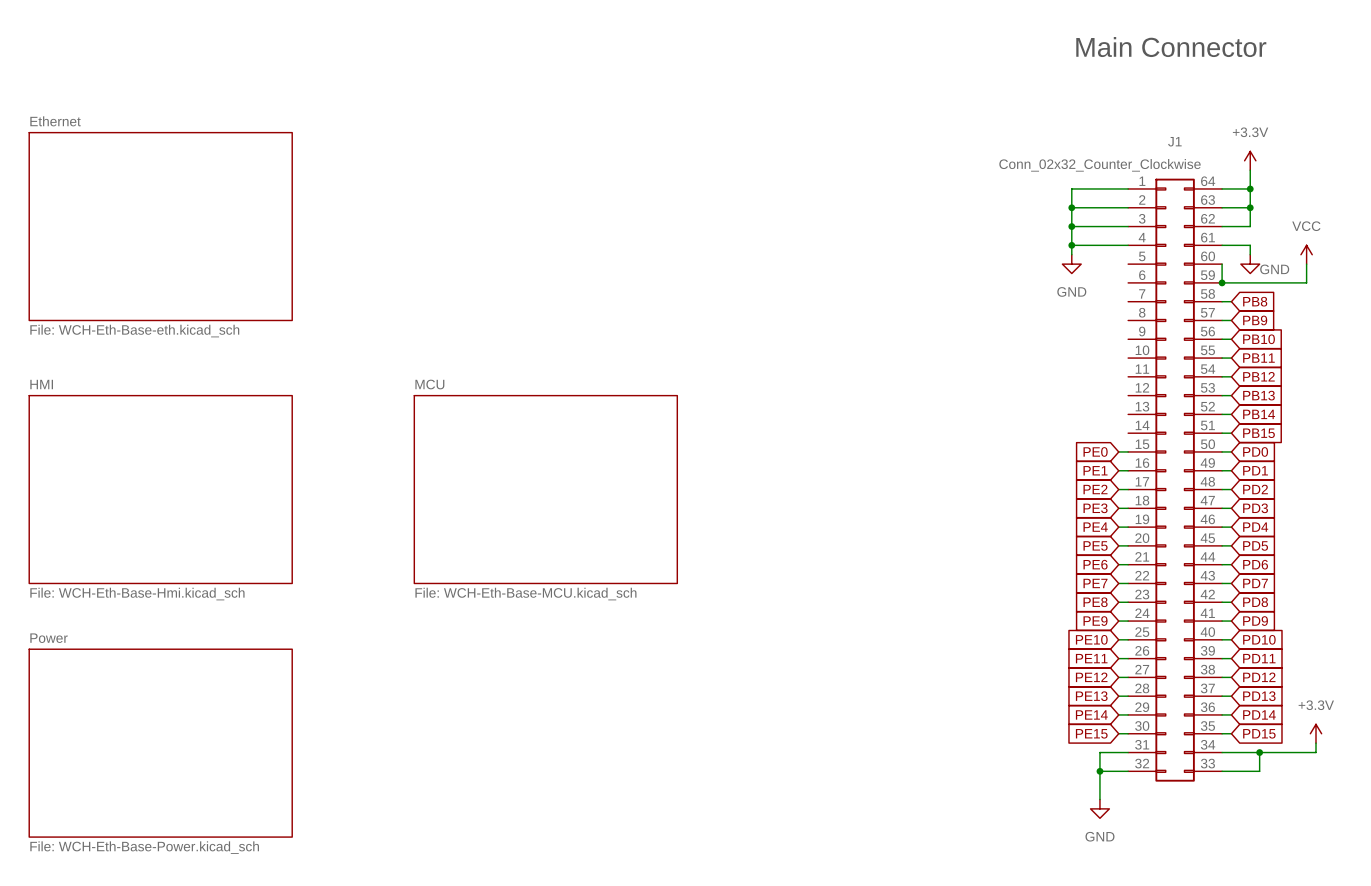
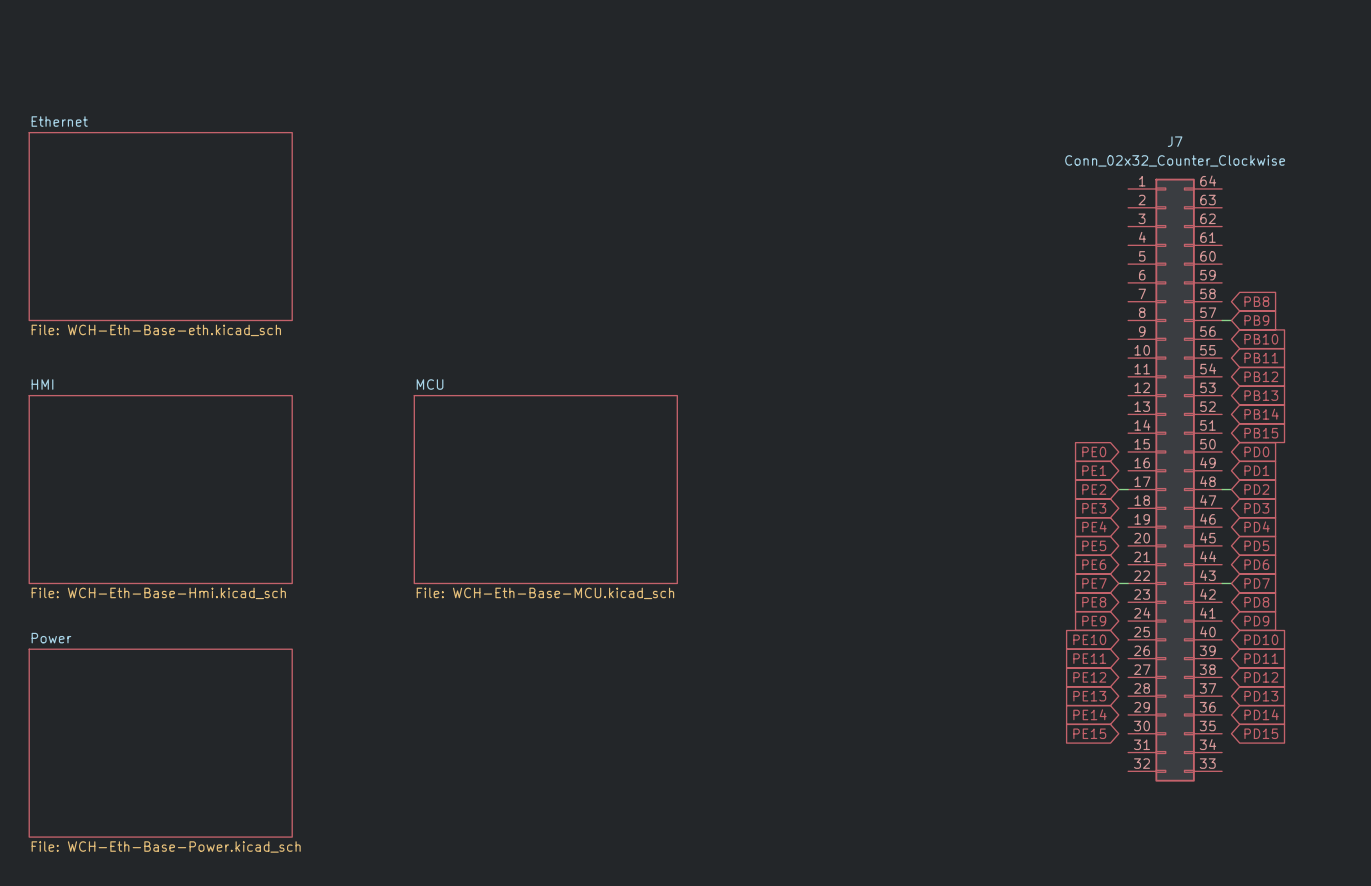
text: Main Connector (1171, 47) -> none
J1 name: J1 (1174, 141) -> J7 (1175, 141)
power symbol: +3.3V (1250, 160) -> none
J1 value position: Conn_02x32_Counter_Clockwise (1100, 165) -> Conn_02x32_Counter_Clockwise (1175, 160)
wire: (1250, 170) (1250, 226) (1222, 226) -> none
wire: (1128, 188) (1071, 188) (1071, 254) -> none
wire: (1222, 188) (1250, 188) -> none
junction: (1250, 188) -> none
wire: (1071, 207) (1128, 207) -> none
junction: (1071, 207) -> none
wire: (1222, 207) (1250, 207) -> none
junction: (1250, 207) -> none
wire: (1071, 226) (1128, 226) -> none
junction: (1071, 226) -> none
wire: (1071, 245) (1128, 245) -> none
junction: (1071, 245) -> none
wire: (1222, 245) (1250, 245) (1250, 254) -> none
power symbol: VCC (1306, 254) -> none
power symbol: GND (1071, 264) -> none
wire: (1222, 264) (1222, 282) (1306, 282) (1306, 264) -> none
power symbol: GND (1250, 264) -> none
junction: (1222, 282) -> none
wire: (1222, 301) (1231, 301) -> none
wire: (1222, 339) (1231, 339) -> none
wire: (1222, 358) (1231, 358) -> none
wire: (1222, 376) (1231, 376) -> none
wire: (1222, 395) (1231, 395) -> none
wire: (1222, 414) (1231, 414) -> none
wire: (1222, 433) (1231, 433) -> none
wire: (1118, 451) (1128, 451) -> none
wire: (1222, 451) (1231, 451) -> none
wire: (1118, 470) (1128, 470) -> none
wire: (1222, 470) (1231, 470) -> none
wire: (1118, 508) (1128, 508) -> none
wire: (1222, 508) (1231, 508) -> none
wire: (1118, 527) (1128, 527) -> none
wire: (1222, 527) (1231, 527) -> none
wire: (1118, 545) (1128, 545) -> none
wire: (1222, 545) (1231, 545) -> none
wire: (1118, 564) (1128, 564) -> none
wire: (1222, 564) (1231, 564) -> none
wire: (1118, 602) (1128, 602) -> none
wire: (1222, 602) (1231, 602) -> none
wire: (1118, 621) (1128, 621) -> none
wire: (1222, 621) (1231, 621) -> none
wire: (1118, 639) (1128, 639) -> none
wire: (1222, 639) (1231, 639) -> none
wire: (1118, 658) (1128, 658) -> none
wire: (1222, 658) (1231, 658) -> none
wire: (1118, 677) (1128, 677) -> none
wire: (1222, 677) (1231, 677) -> none
wire: (1118, 696) (1128, 696) -> none
wire: (1222, 696) (1231, 696) -> none
wire: (1118, 714) (1128, 714) -> none
wire: (1222, 714) (1231, 714) -> none
wire: (1118, 733) (1128, 733) -> none
wire: (1222, 733) (1231, 733) -> none
power symbol: +3.3V (1316, 733) -> none
wire: (1316, 743) (1316, 752) (1222, 752) -> none
wire: (1128, 752) (1099, 752) (1099, 799) -> none
wire: (1259, 752) (1259, 771) (1222, 771) -> none
junction: (1259, 752) -> none
wire: (1099, 771) (1128, 771) -> none
junction: (1099, 771) -> none
power symbol: GND (1099, 808) -> none

